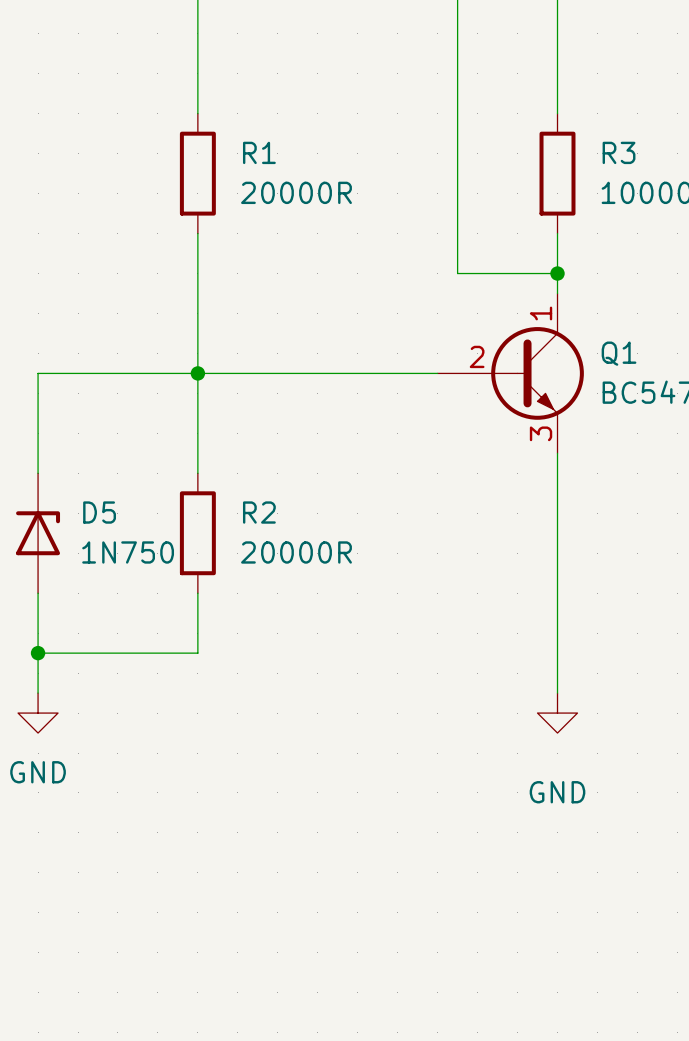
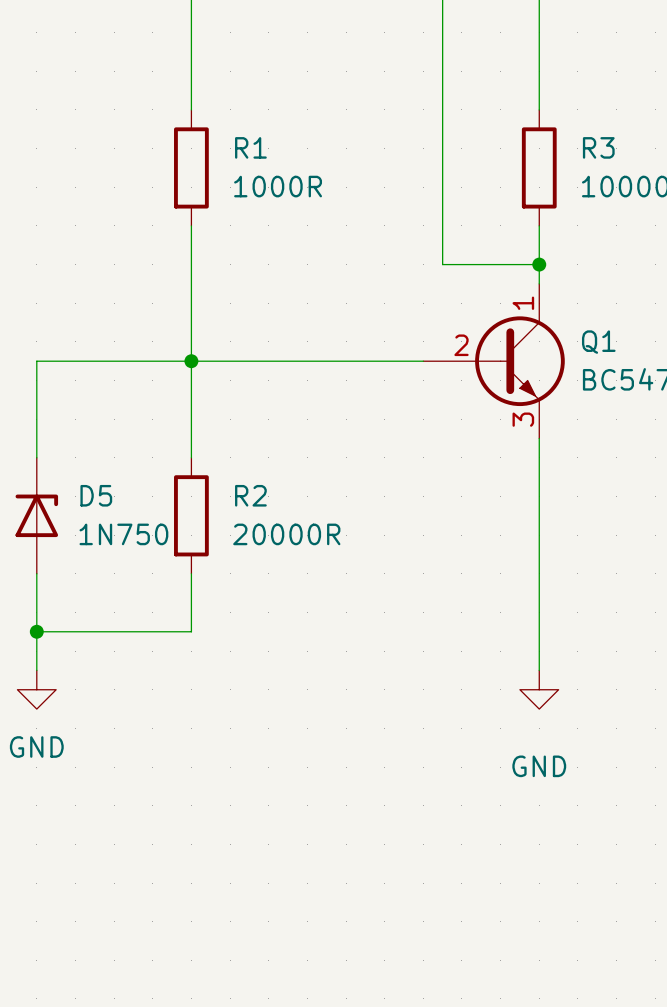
R1 value: 20000R (296, 192) -> 1000R (278, 186)

